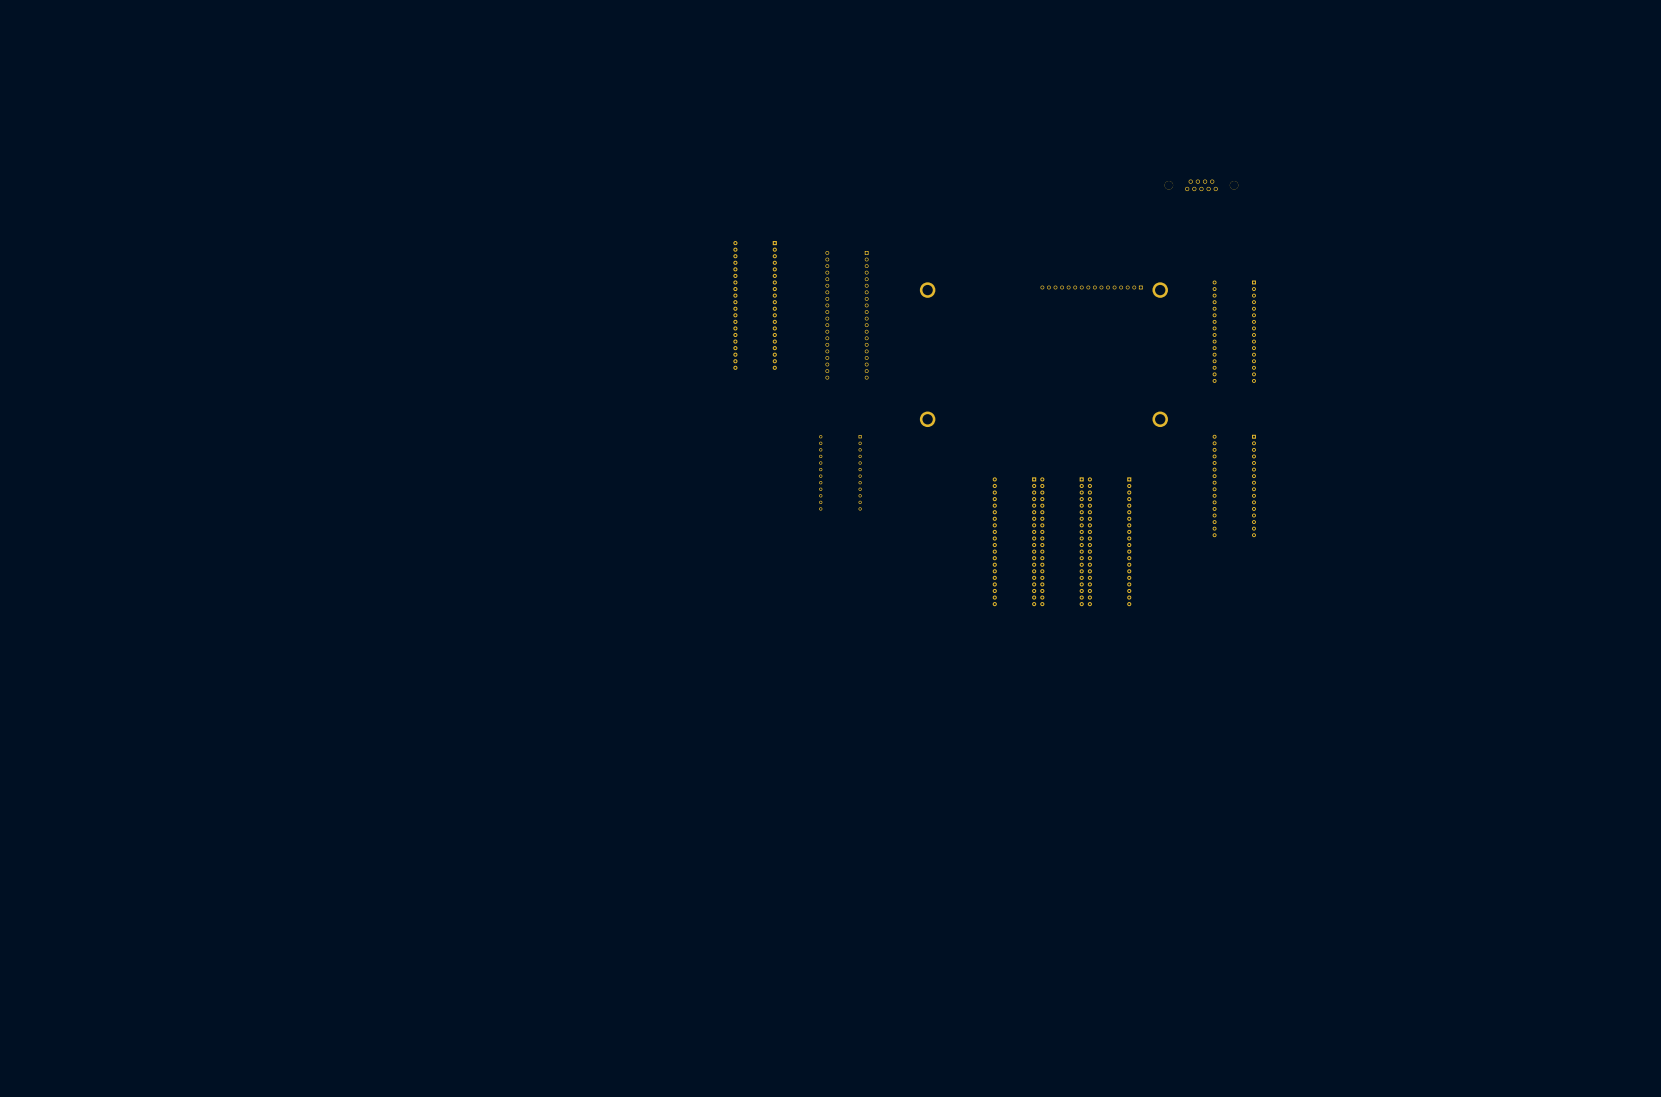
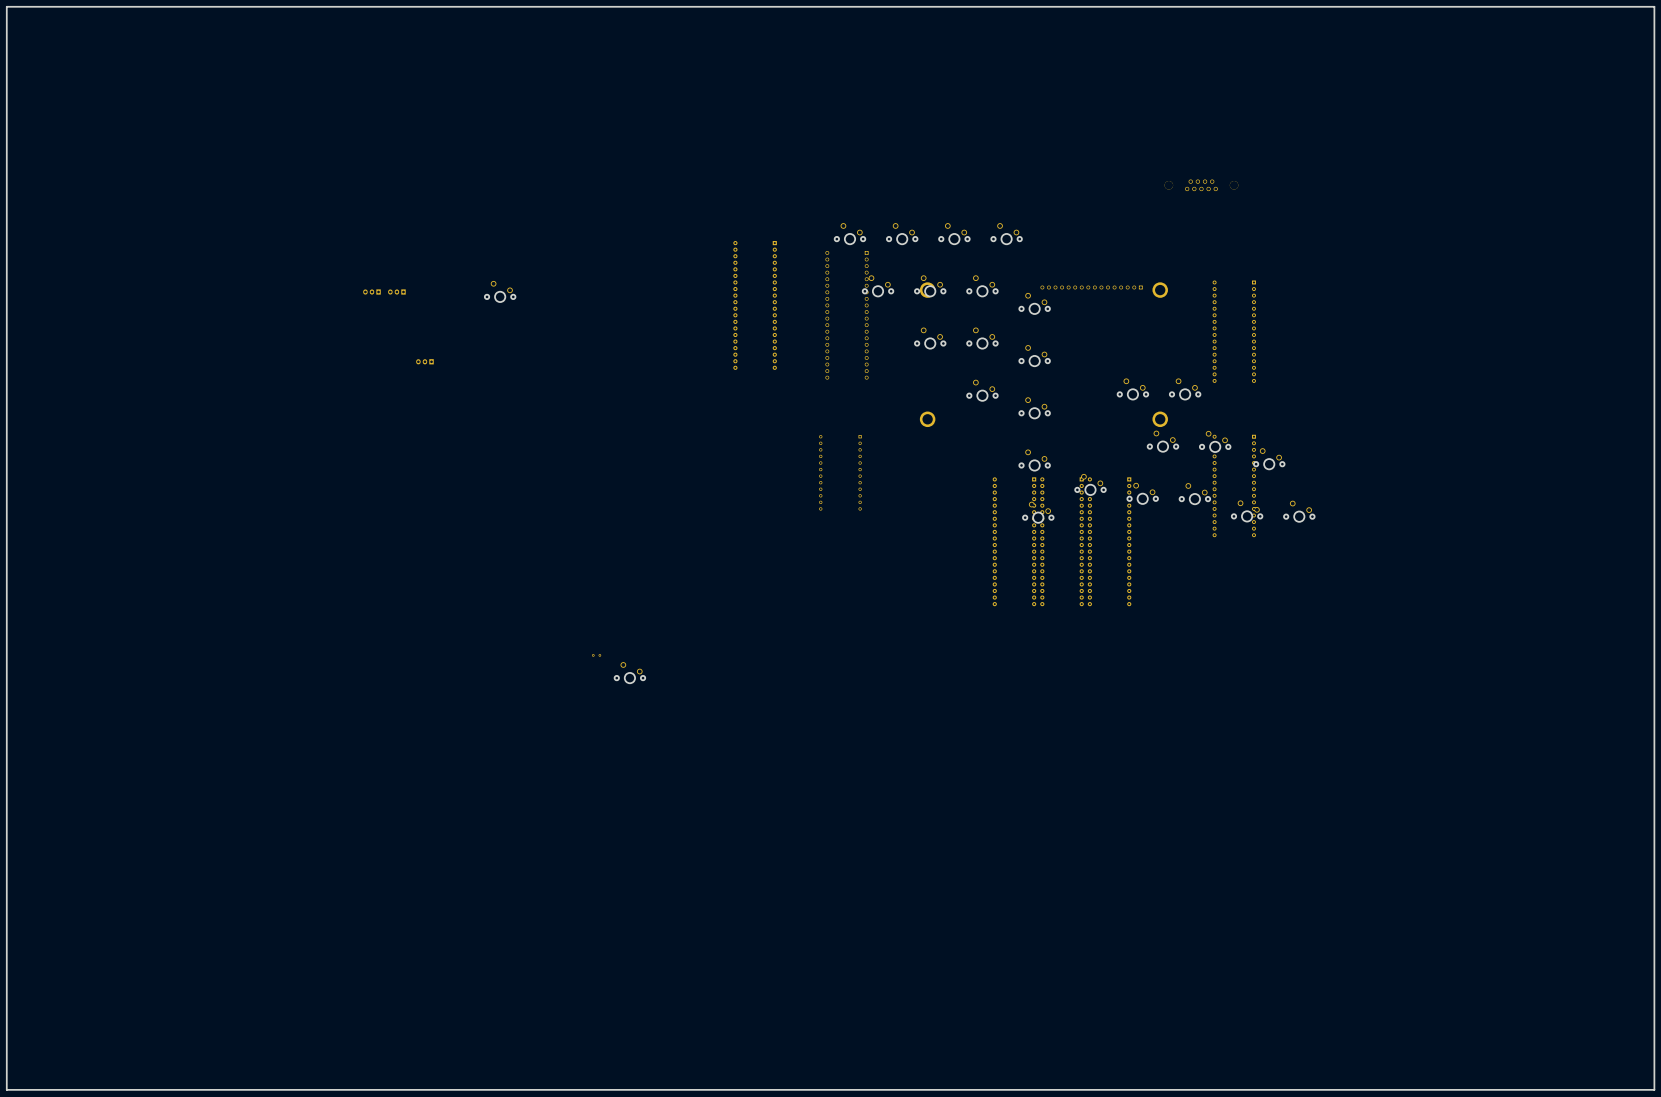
board edge: none -> (1654, 6) (6, 6) (6, 1089) (1654, 1089) (1654, 6)
part: none -> (849, 233)
part: none -> (902, 233)
part: none -> (954, 233)
part: none -> (1006, 233)
part: none -> (878, 285)
part: none -> (930, 285)
part: none -> (982, 285)
part: none -> (500, 291)
part: none -> (371, 292)
part: none -> (396, 292)
part: none -> (1034, 303)
part: none -> (930, 338)
part: none -> (982, 338)
part: none -> (1034, 355)
part: none -> (424, 361)
part: none -> (1132, 389)
part: none -> (1185, 389)
part: none -> (982, 390)
part: none -> (1034, 407)
part: none -> (1162, 441)
part: none -> (1215, 441)
part: none -> (1269, 458)
part: none -> (1034, 460)
part: none -> (1090, 484)
part: none -> (1142, 493)
part: none -> (1194, 493)
part: none -> (1247, 510)
part: none -> (1299, 511)
part: none -> (1038, 512)
part: none -> (596, 655)
part: none -> (629, 672)

